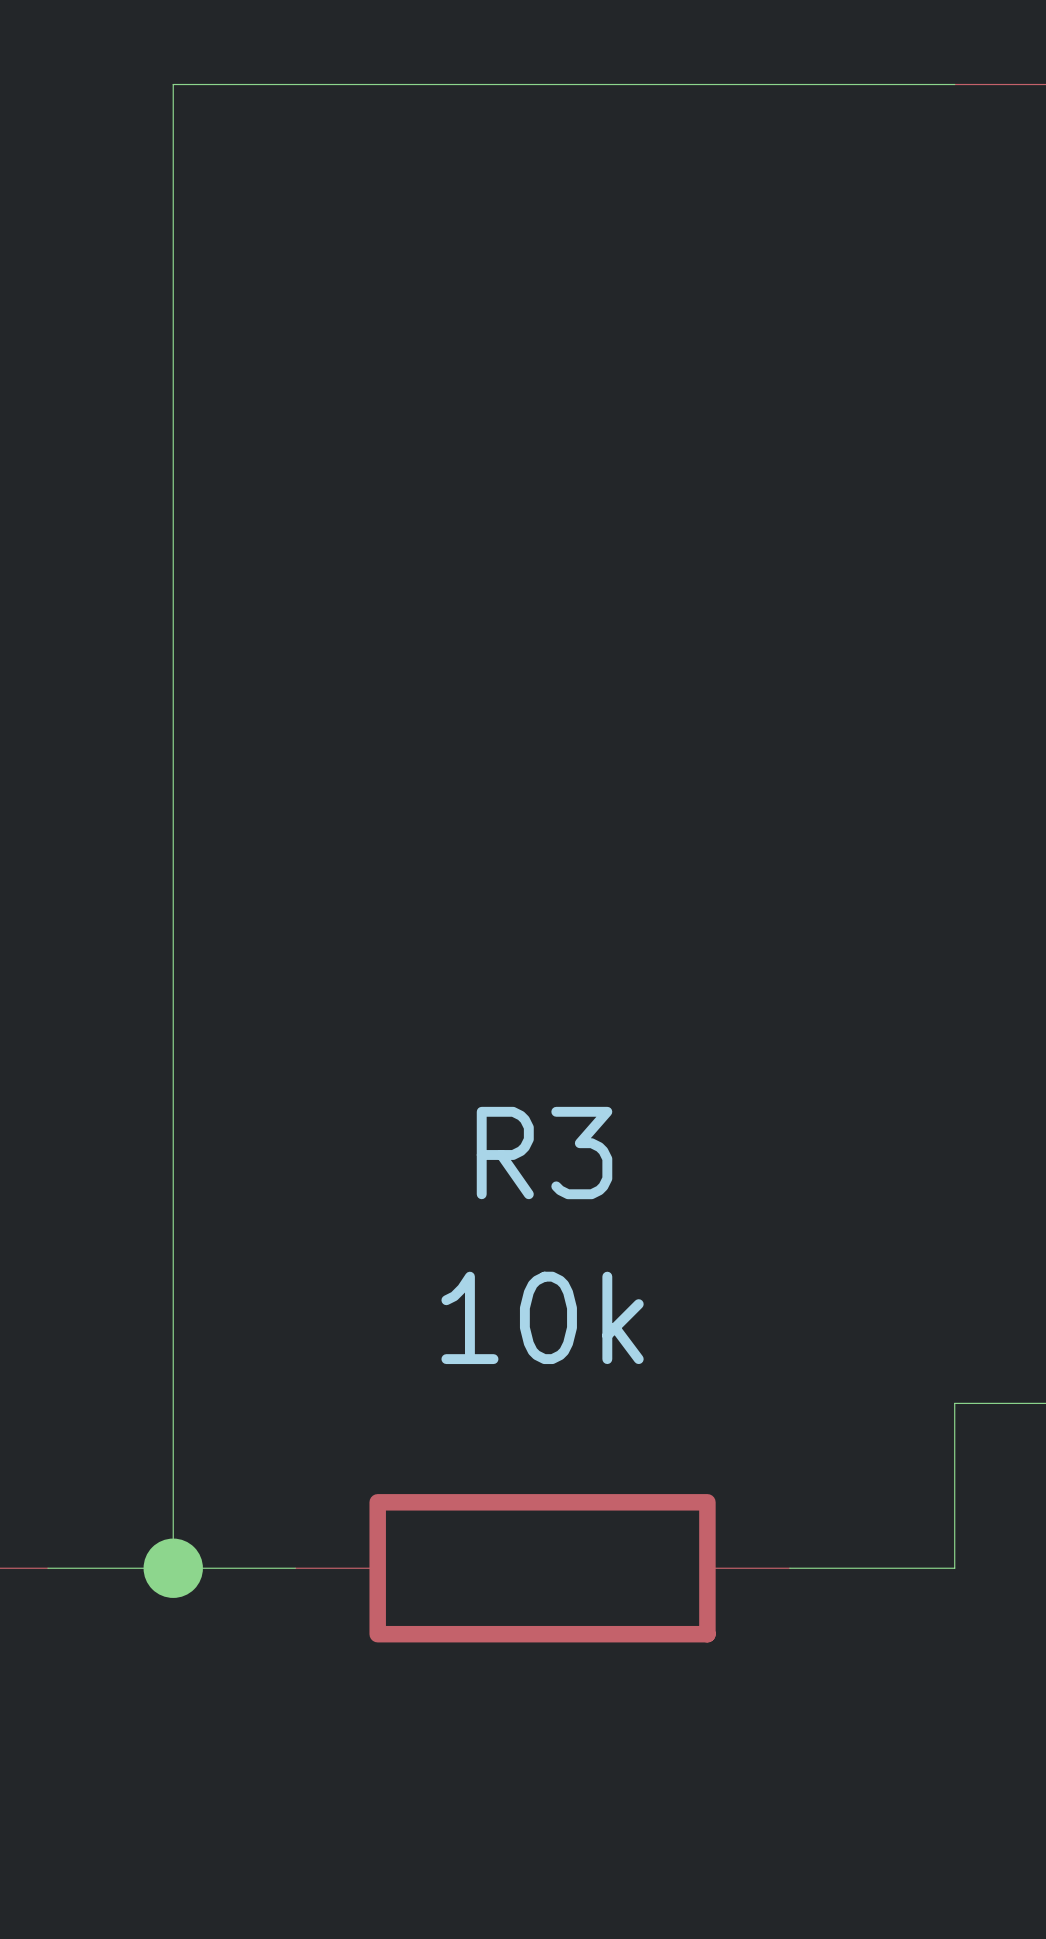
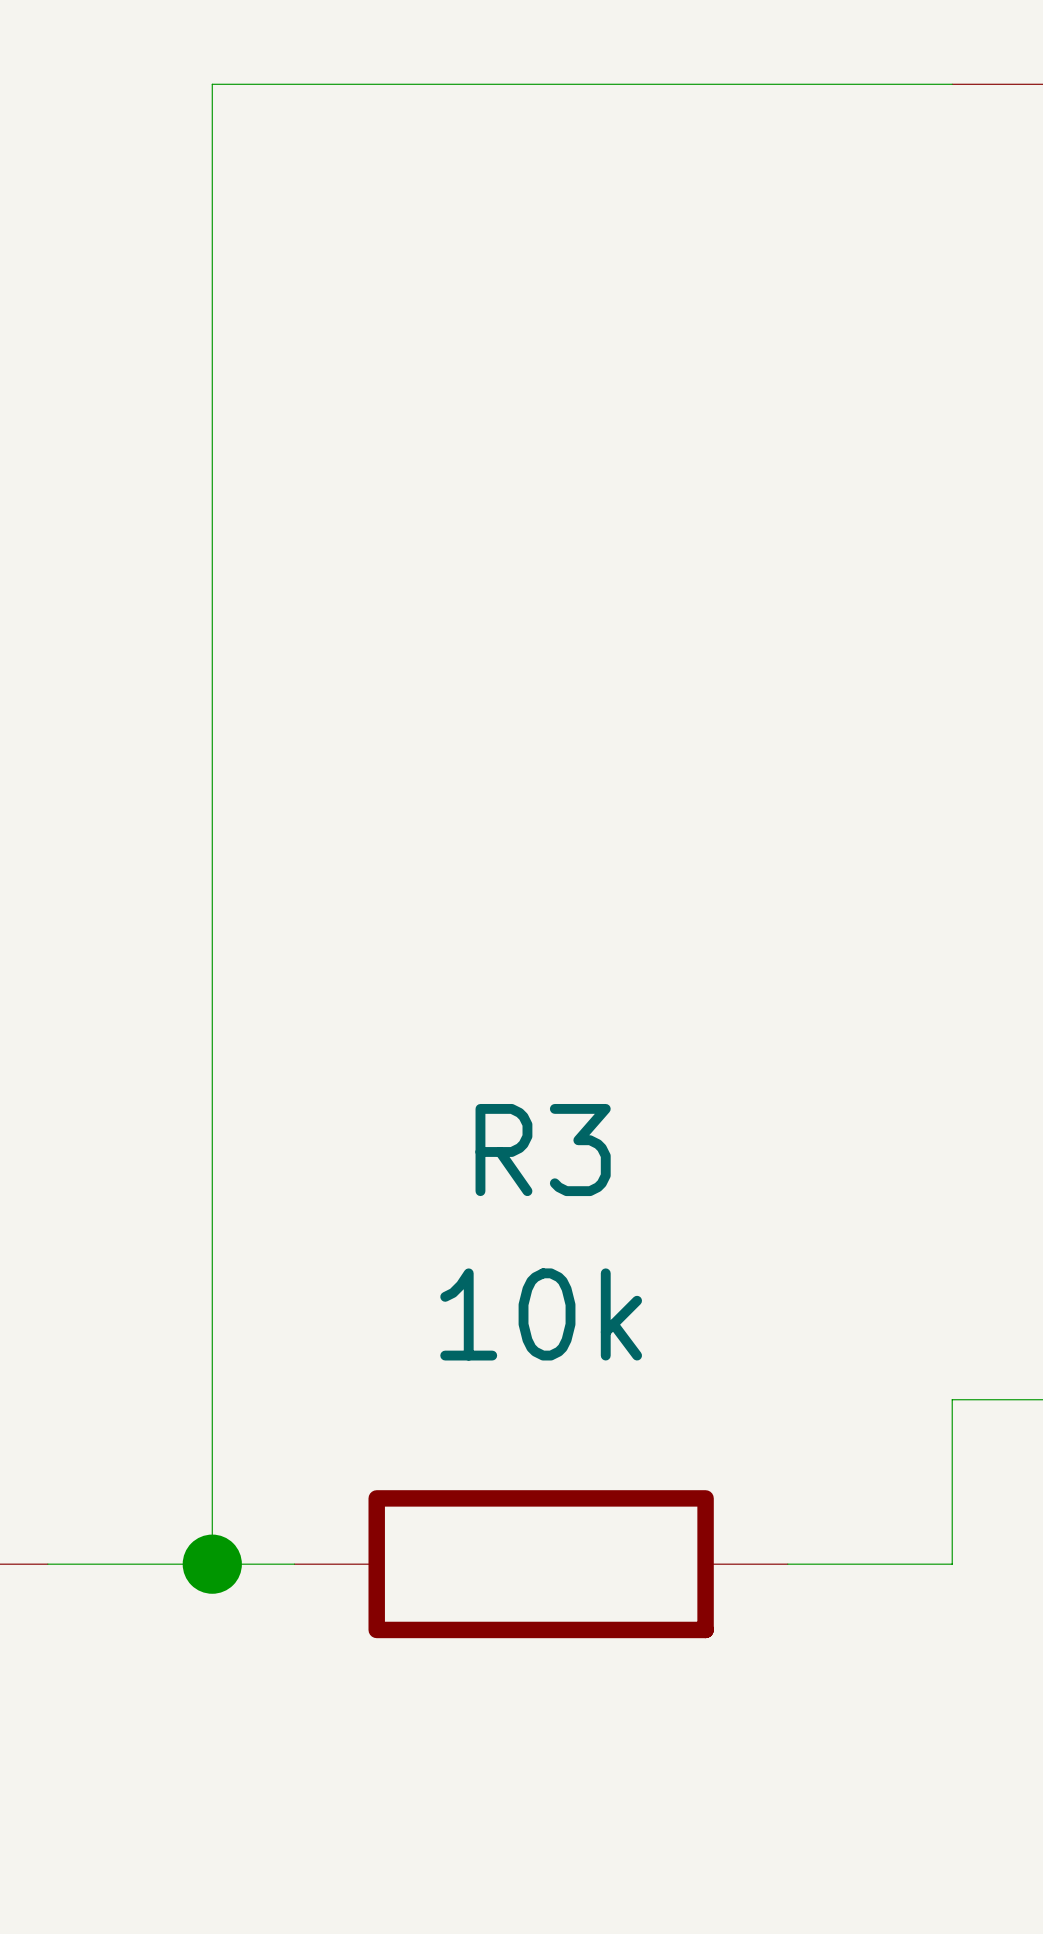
wire: (212, 84) (173, 84) (173, 1568) -> (212, 84) (212, 1564)
junction position: (173, 1568) -> (212, 1564)

